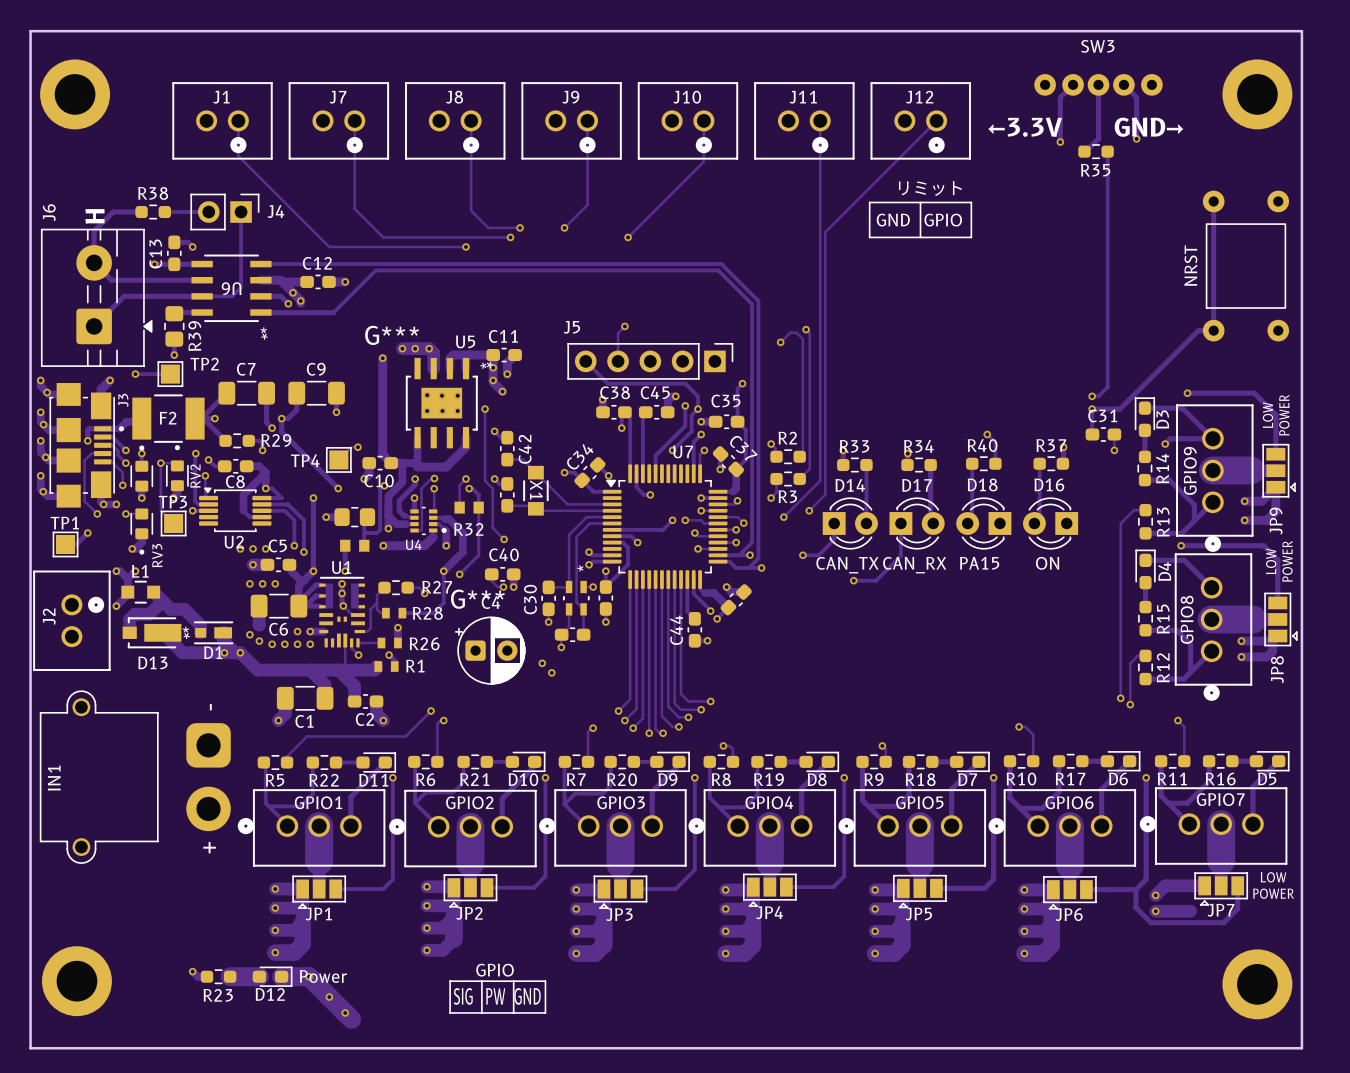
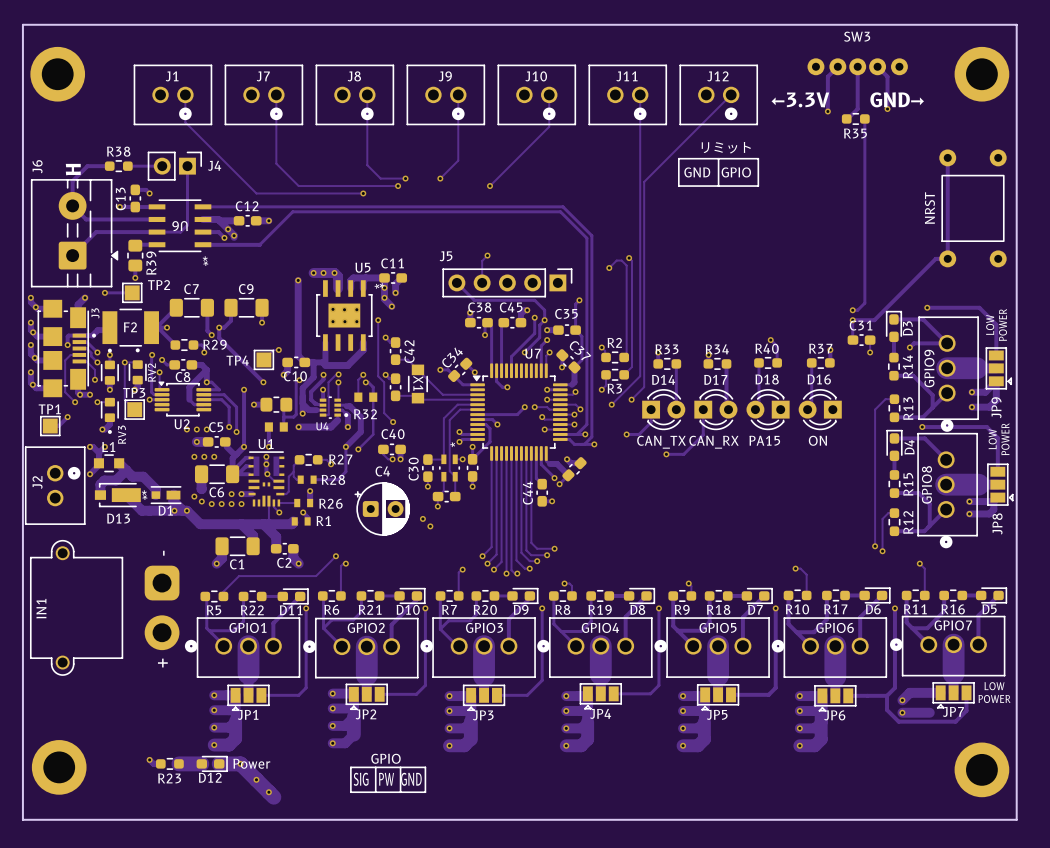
G***: (392, 335) -> none
G***: (477, 599) -> none

